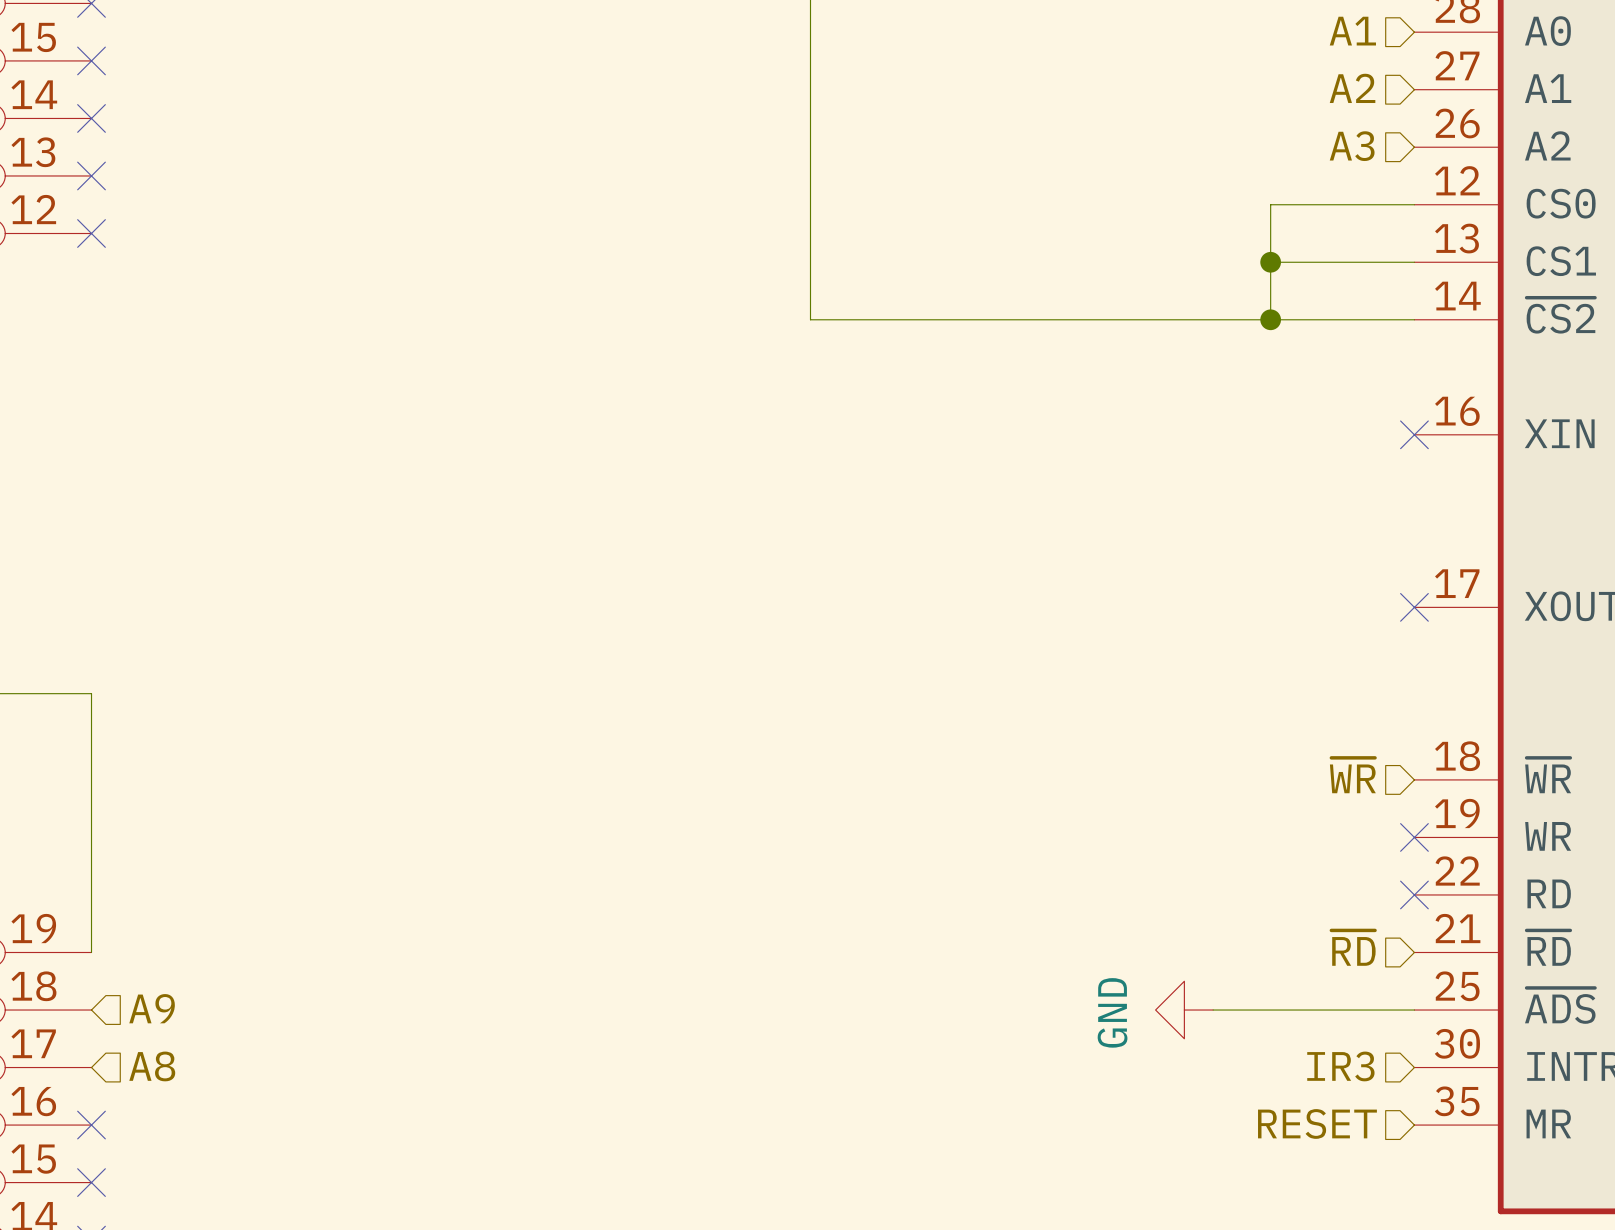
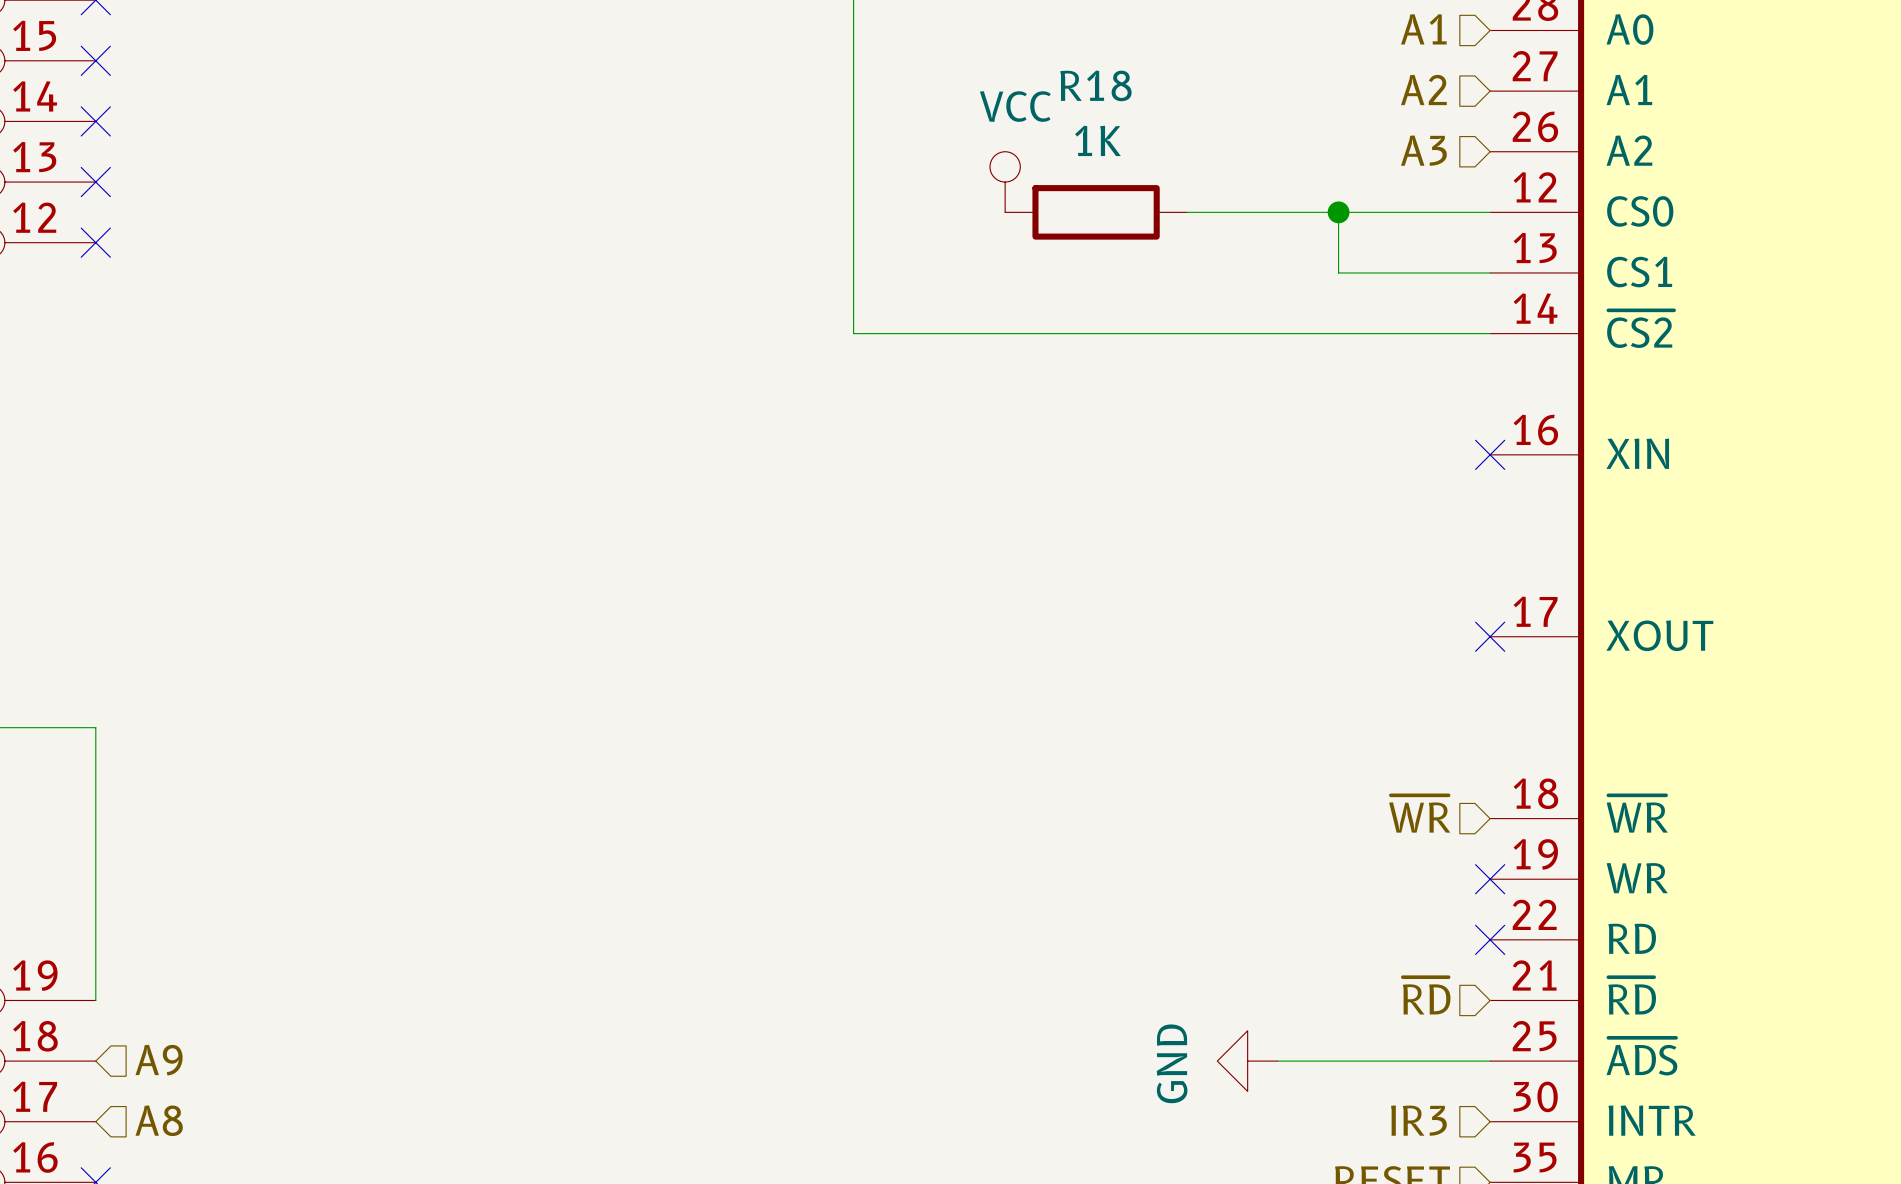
power symbol: none -> VCC (1005, 182)
R18: none -> 1K (1096, 212)
wire: none -> (1187, 212) (1338, 212)
junction: none -> (1338, 212)
wire: (1270, 262) (1270, 319) -> none
junction: (1270, 262) -> none
junction: (1270, 319) -> none

